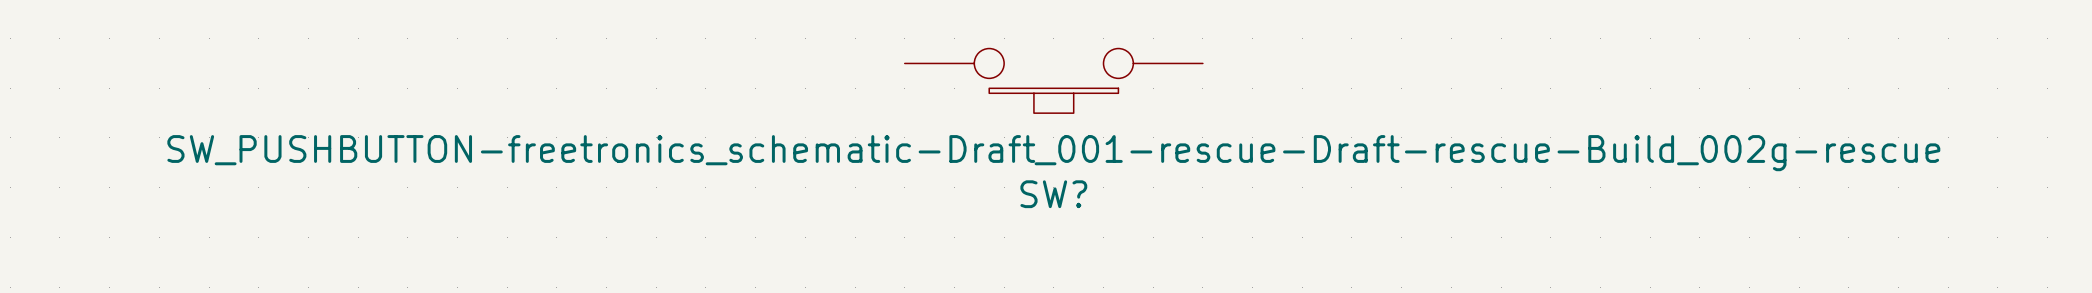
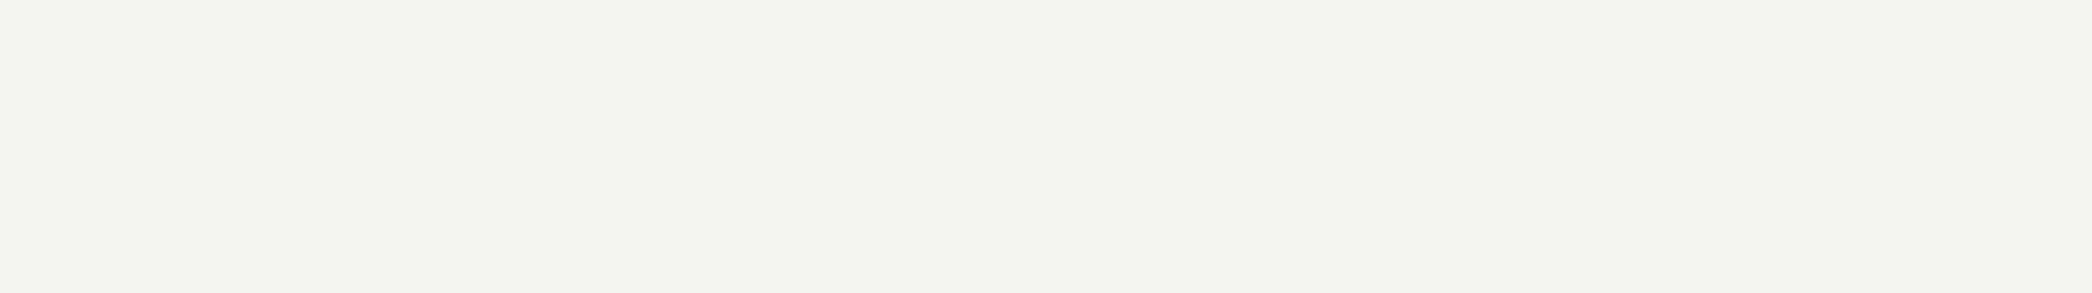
SW?: SW_PUSHBUTTON-freetronics_schematic-Draft_001-rescue-Draft-rescue-Build_002g-rescue (1053, 80) -> none

